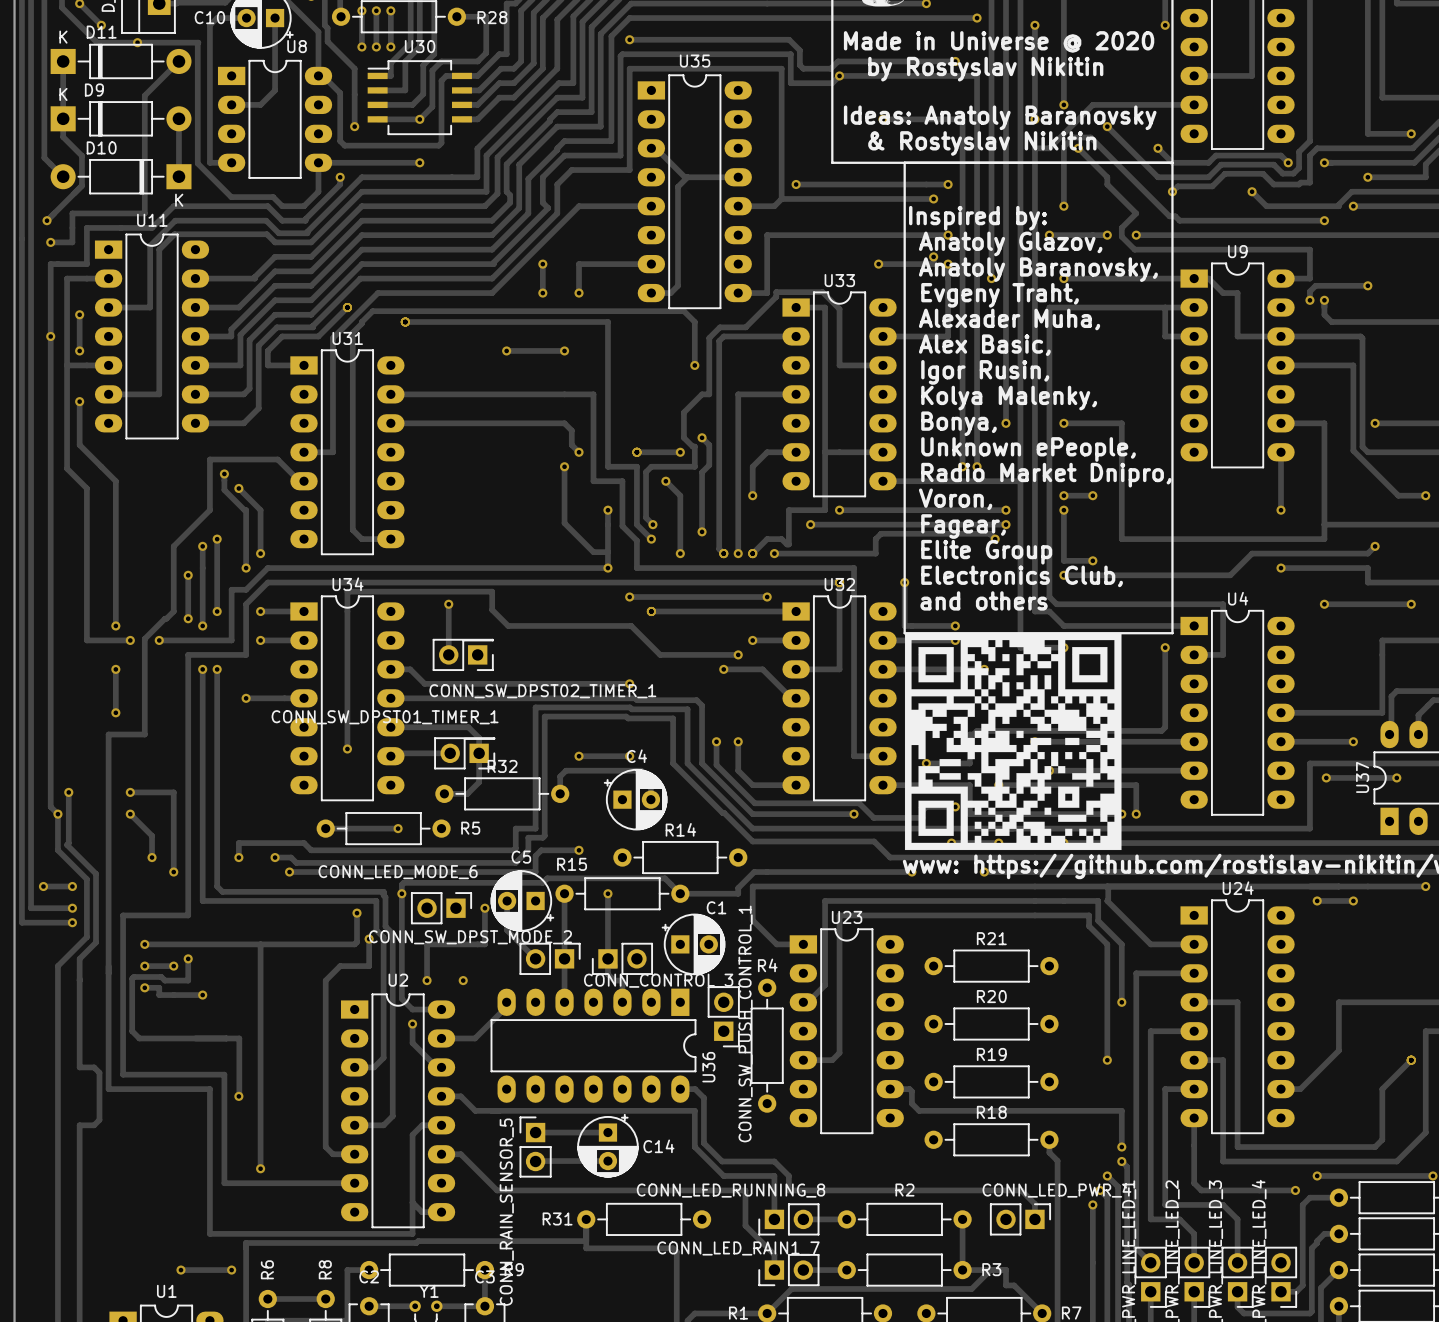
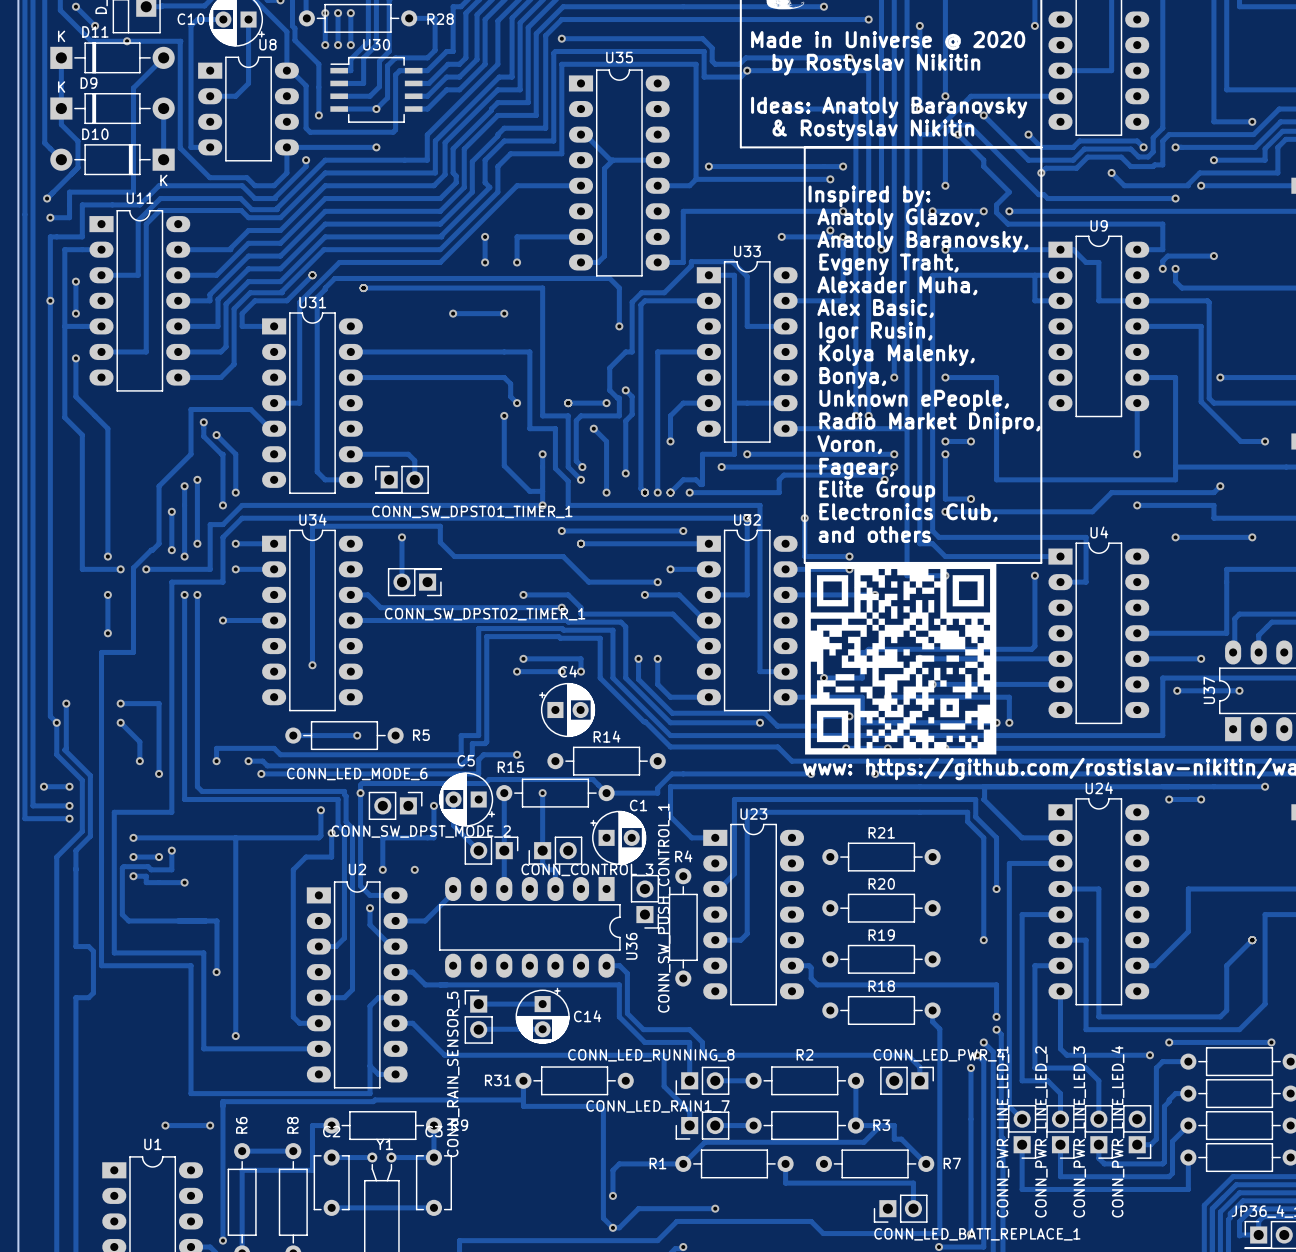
track: none -> (350, 454) (408, 454) (414, 460) (414, 479)
track: none -> (523, 594) (568, 594) (581, 607) (581, 614) (672, 614) (704, 646) (708, 646)
via: none -> (523, 594)
track: (390, 727) (468, 727) (479, 737) (479, 782) (467, 793) (444, 793) -> none
track: none -> (523, 658) (581, 658) (581, 671)
via: none -> (523, 658)
track: (450, 753) (393, 753) (390, 756) -> none
CONN_SW_DPST01_TIMER_1 rotation: 0° (464, 753) -> 180° (401, 479)
CONN_SW_DPST01_TIMER_1 position: (464, 753) -> (401, 479)
via: none -> (581, 671)
R32: (502, 793) -> none
track: (560, 793) (560, 776) (565, 770) (641, 770) (650, 780) (650, 799) -> none

